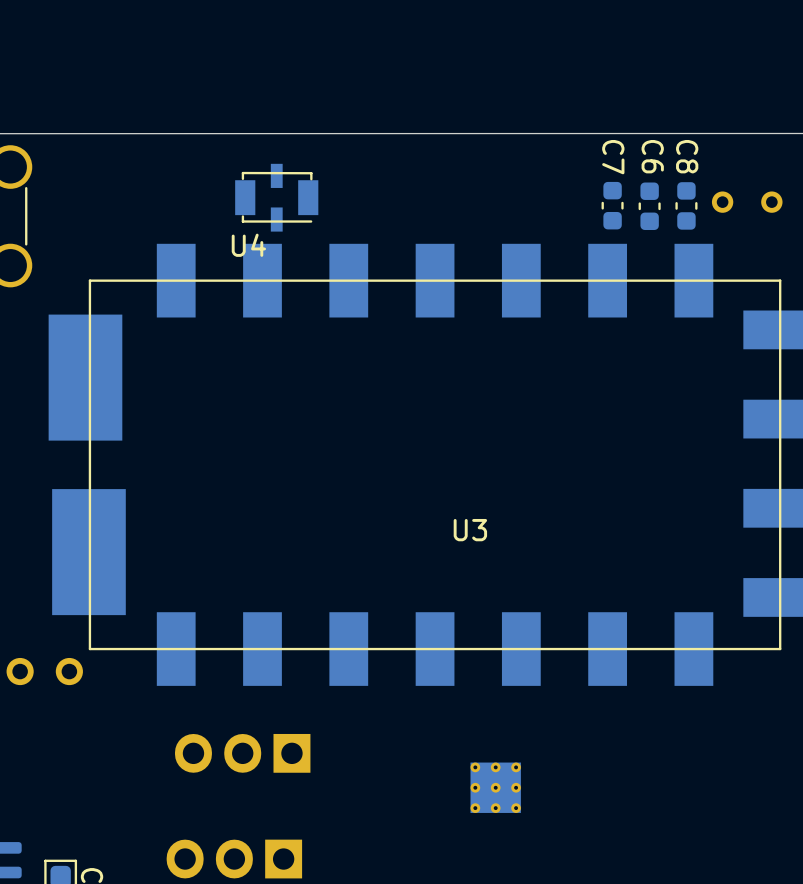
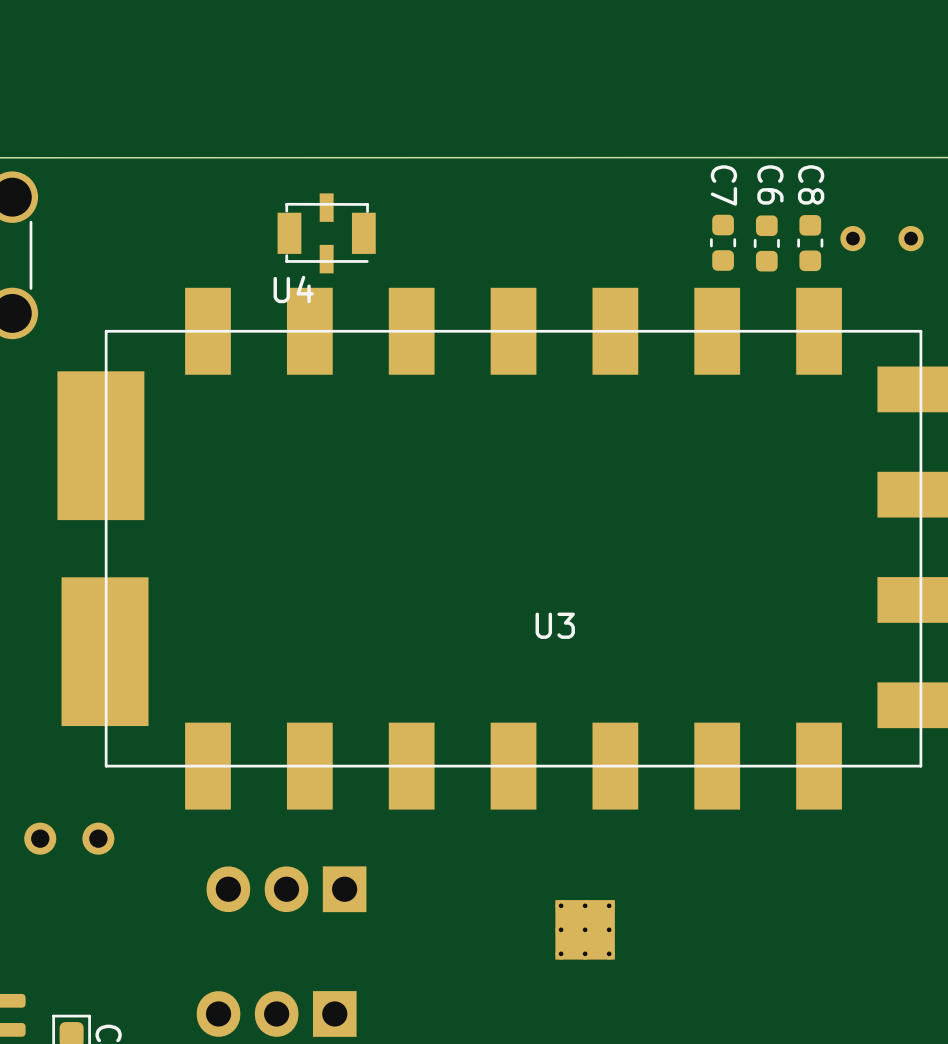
part position: (44, 671) -> (69, 838)

